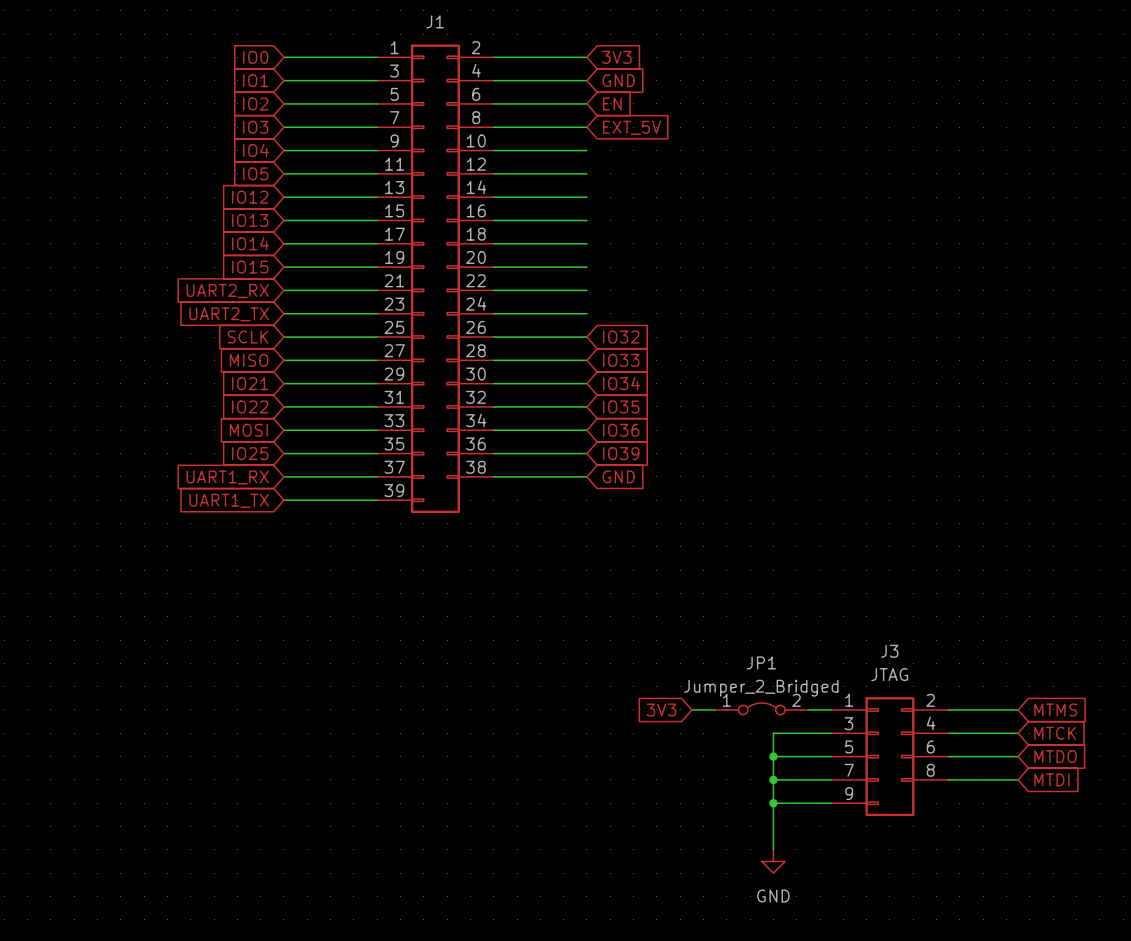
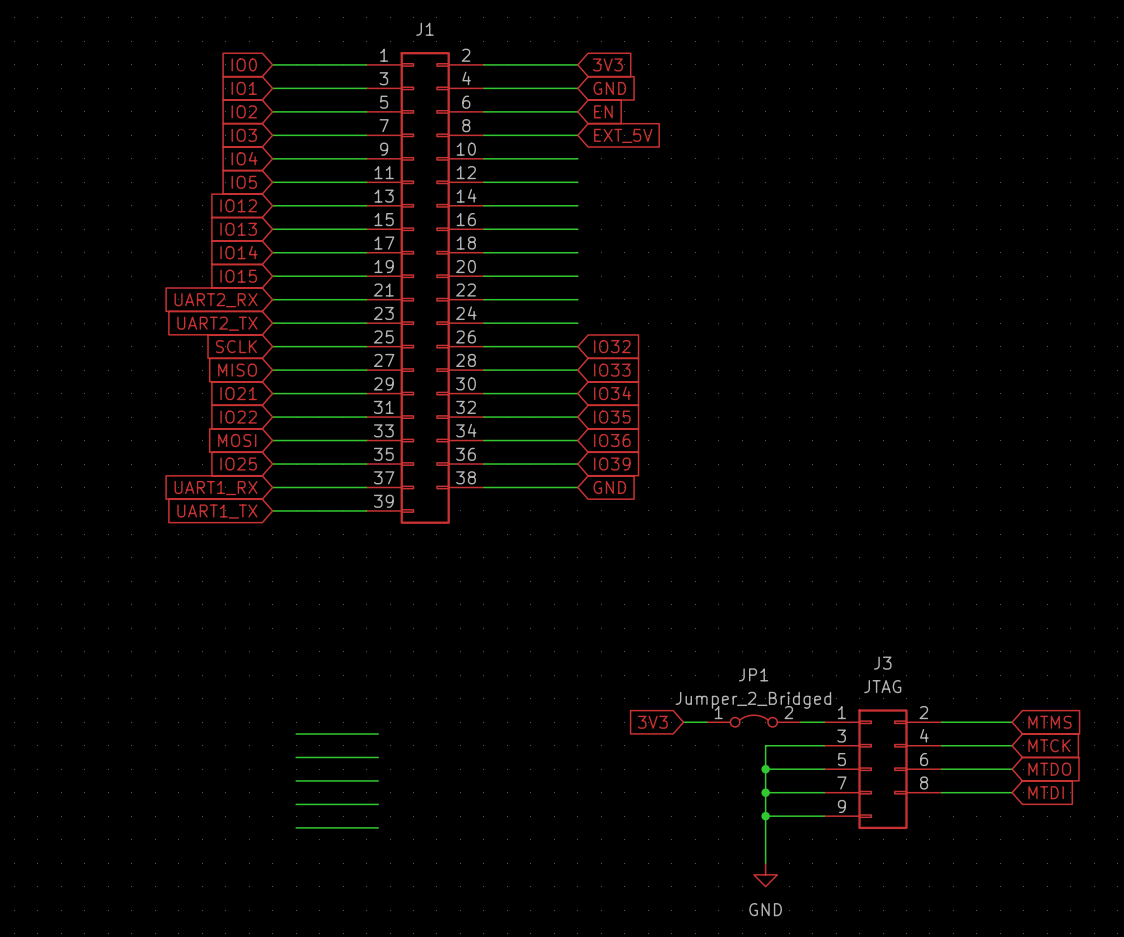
wire: none -> (296, 734) (378, 734)
wire: none -> (296, 757) (378, 757)
wire: none -> (296, 780) (378, 780)
wire: none -> (296, 804) (378, 804)
wire: none -> (296, 827) (378, 827)

